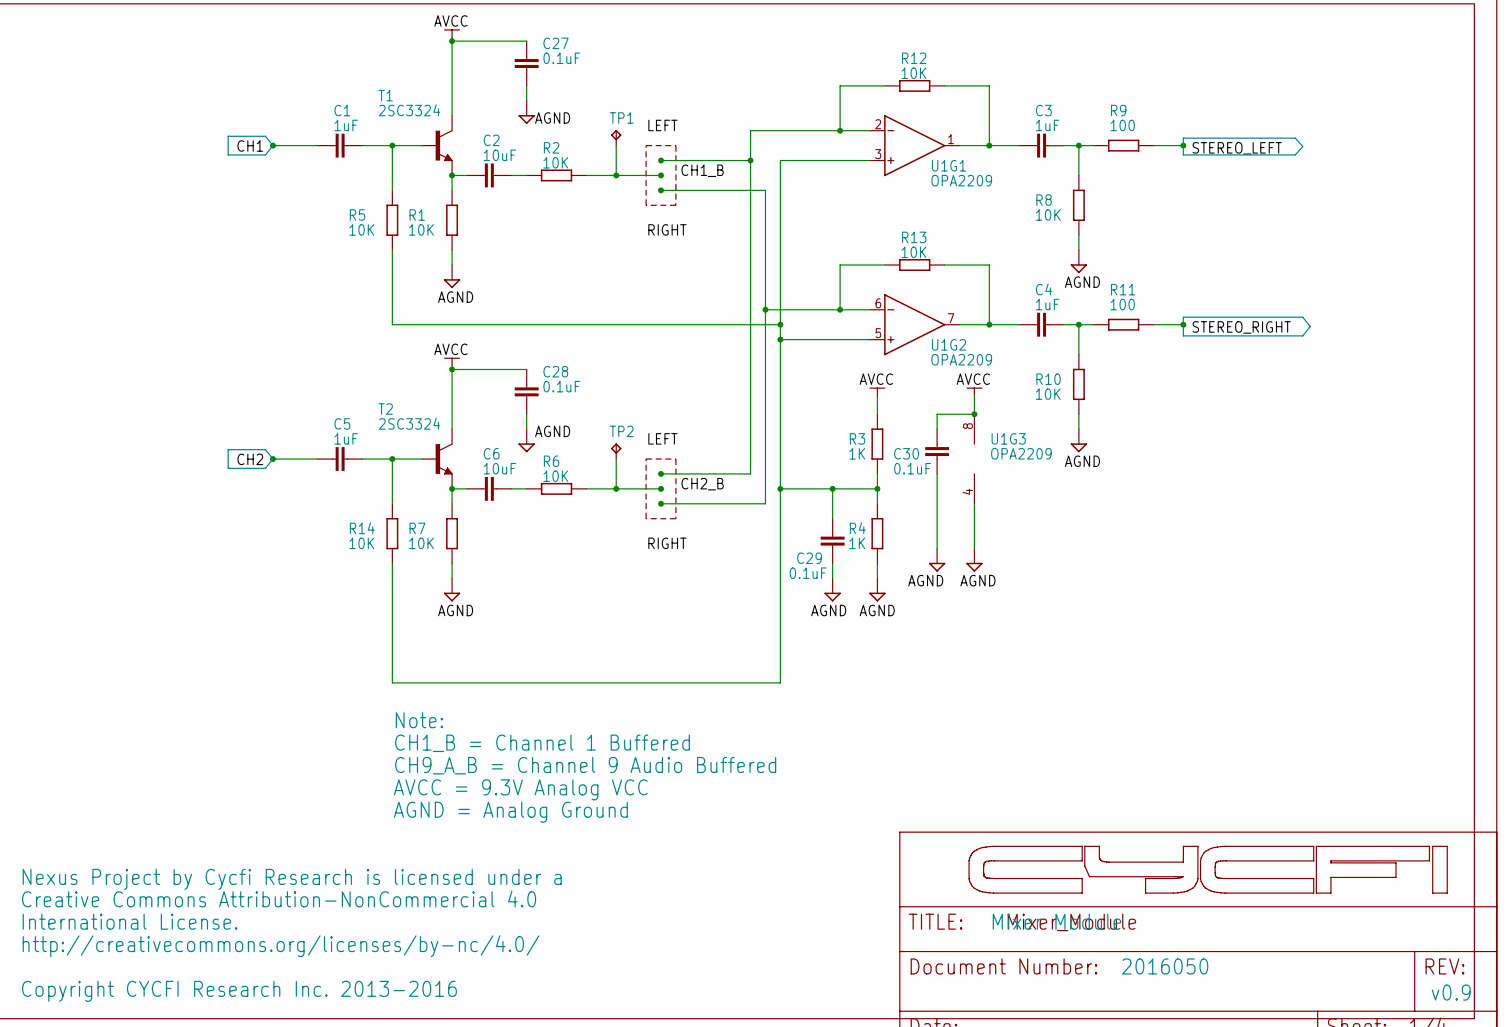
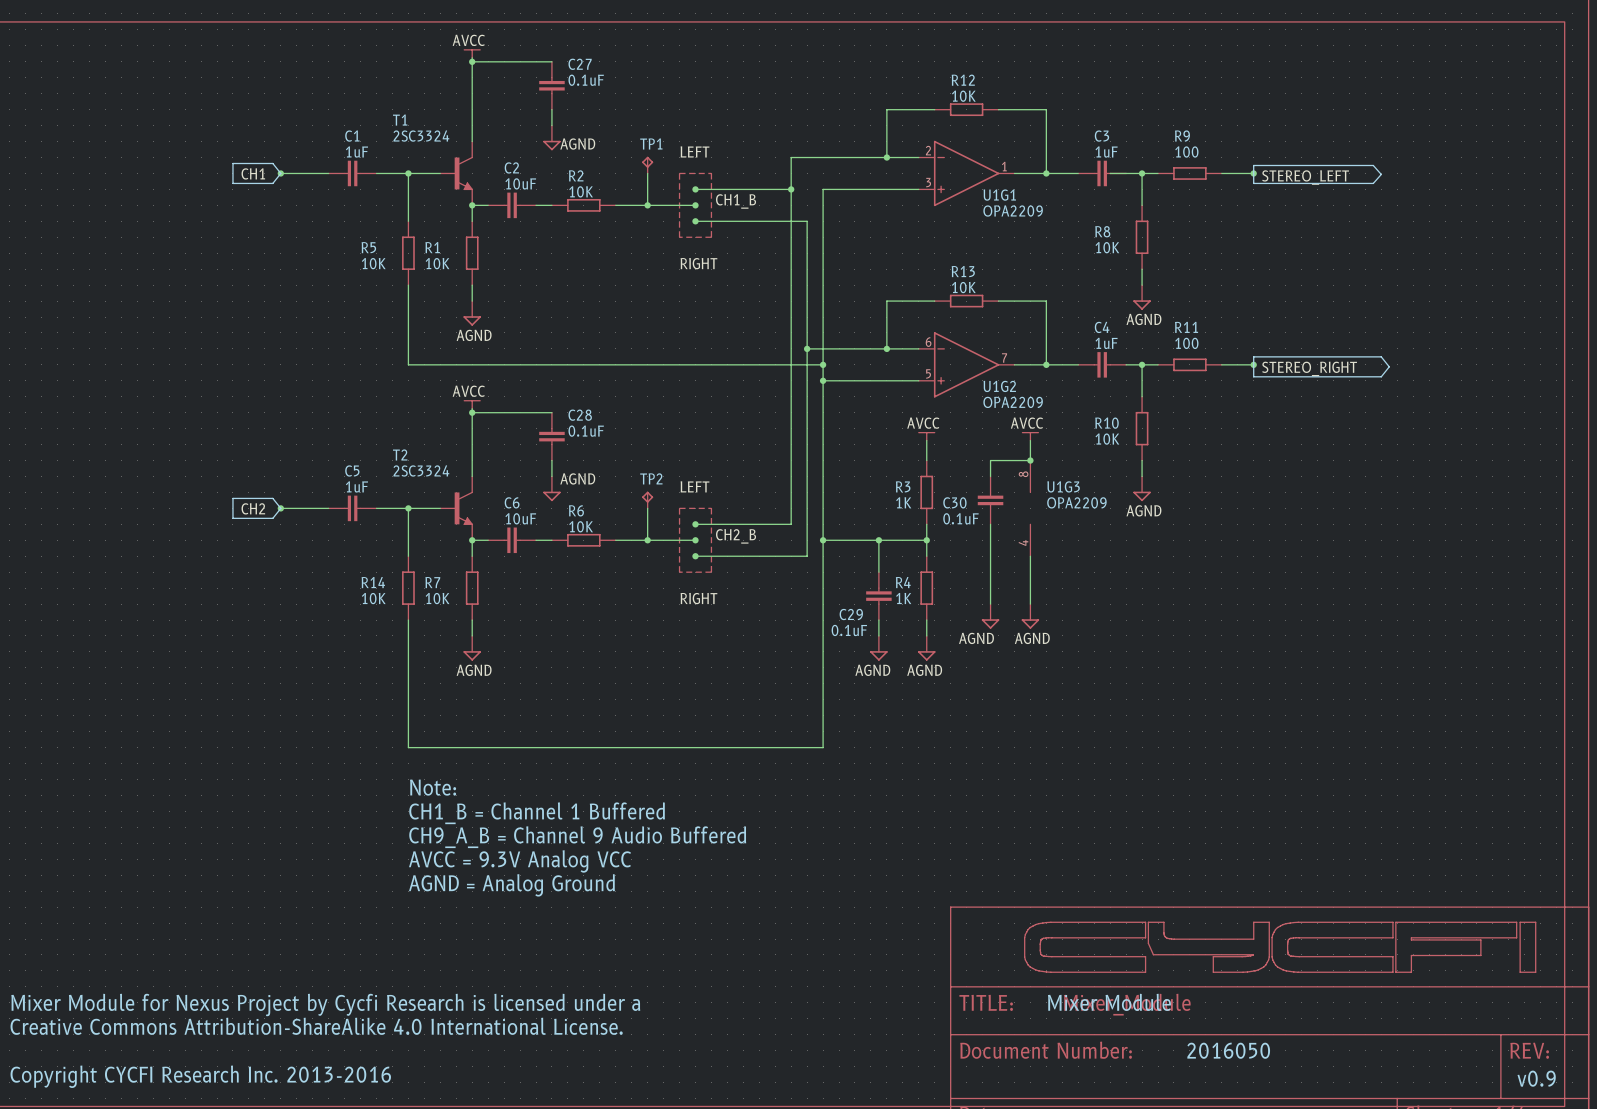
text: Nexus Project by Cycfi Research is licensed under a (292, 879) -> none
text: Creative Commons Attribution-NonCommercial 4.0 (279, 898) -> none
text: International License. (130, 921) -> Mixer Module for Nexus Project by Cycfi Research is licensed under a (325, 1004)
text: http://creativecommons.org/licenses/by-nc/4.0/ (281, 946) -> Creative Commons Attribution-ShareAlike 4.0 International License. (316, 1026)

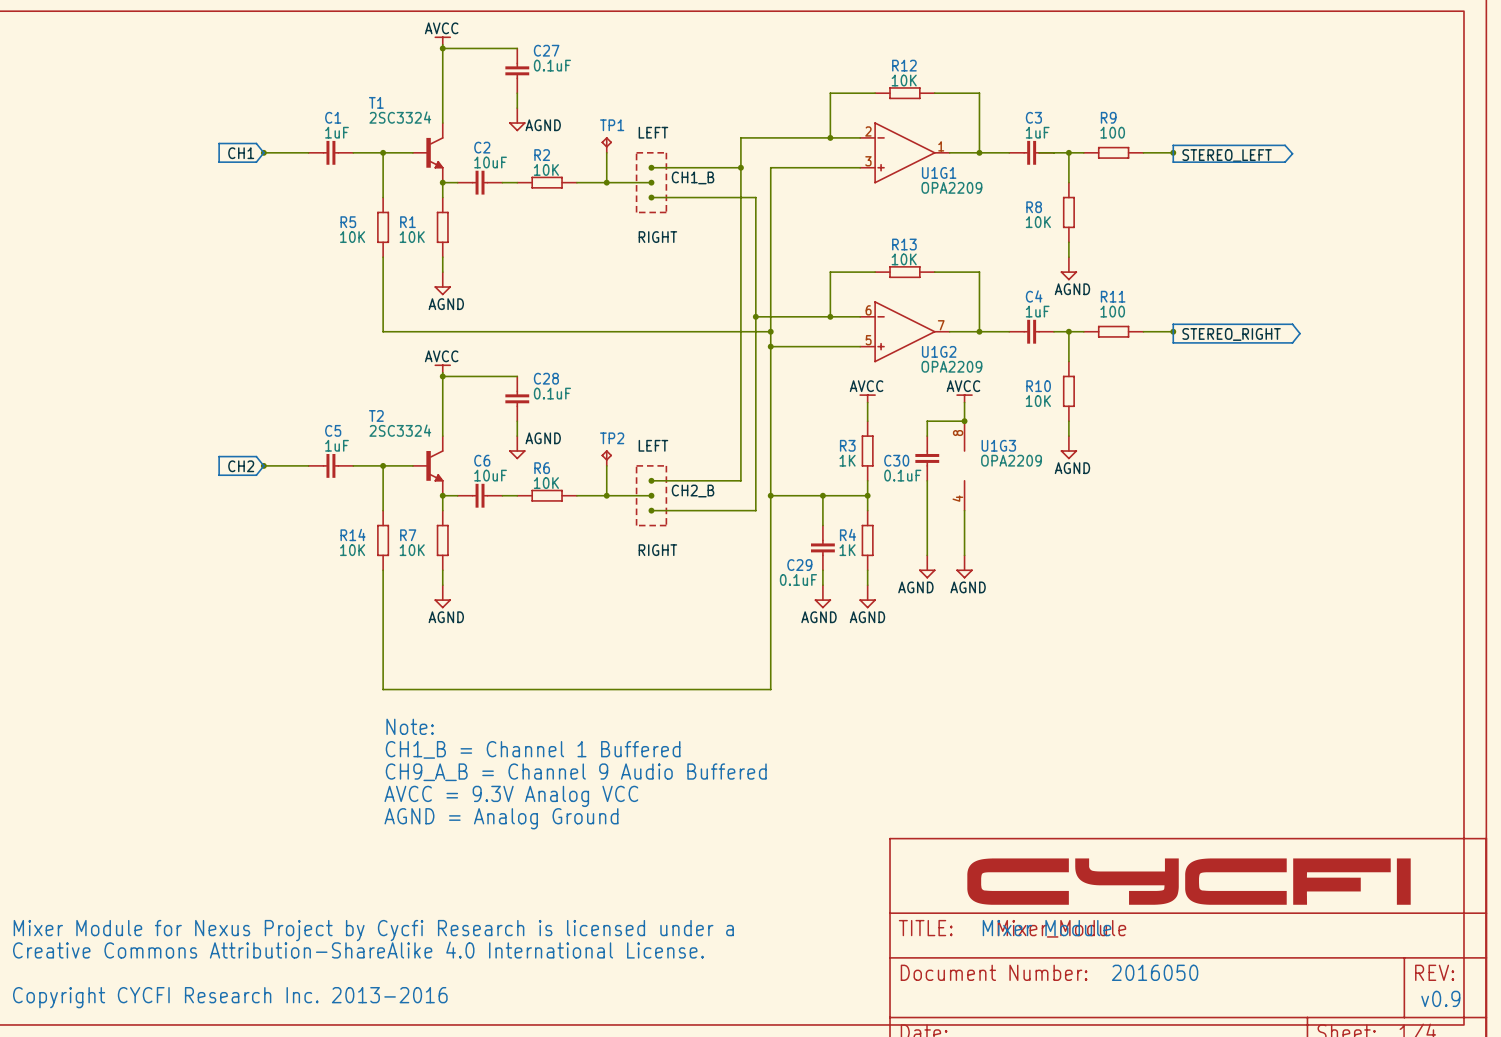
line: (1148, 922) (1163, 922) (1164, 936) (1174, 939) (1253, 939) (1253, 922) (1269, 922) (1268, 959) (1263, 967) (1255, 970) (1213, 972) (1213, 956) (1253, 954) (1153, 954) (1148, 943) (1148, 922) -> none
line: (1395, 922) (1516, 922) (1516, 937) (1411, 937) (1411, 939) (1480, 939) (1480, 955) (1411, 955) (1411, 972) (1395, 972) (1395, 922) -> none
line: (1520, 922) (1535, 922) (1535, 972) (1520, 972) (1520, 922) -> none
drawing: none -> [967, 858, 1411, 905]
line: (1040, 952) (1040, 941) (1043, 938) (1145, 937) (1145, 922) (1046, 922) (1030, 927) (1024, 937) (1025, 959) (1030, 967) (1038, 970) (1145, 972) (1145, 956) (1043, 956) (1040, 952) -> none
line: (1287, 952) (1287, 941) (1290, 938) (1392, 937) (1392, 922) (1293, 922) (1277, 927) (1272, 937) (1272, 959) (1277, 967) (1286, 970) (1392, 972) (1392, 956) (1290, 956) (1287, 952) -> none

